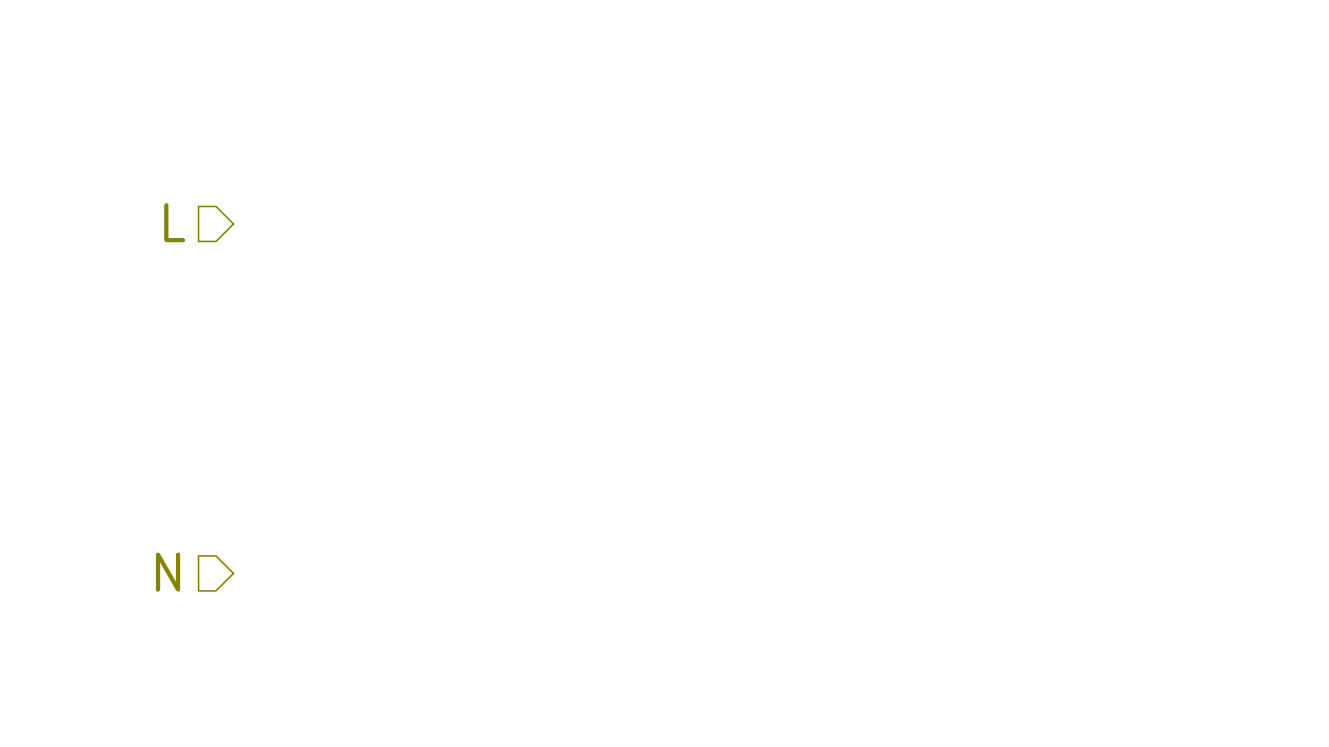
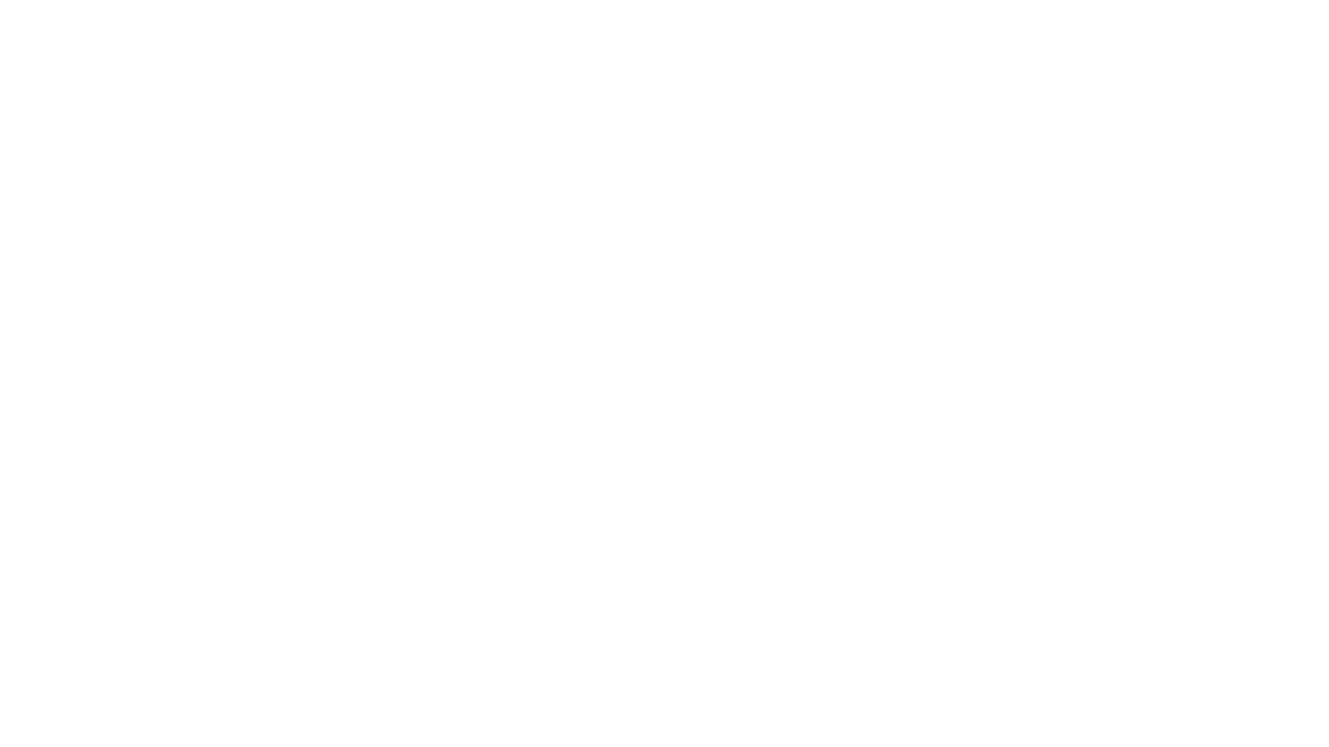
hierarchical label: L (174, 222) -> none
hierarchical label: N (168, 572) -> none

